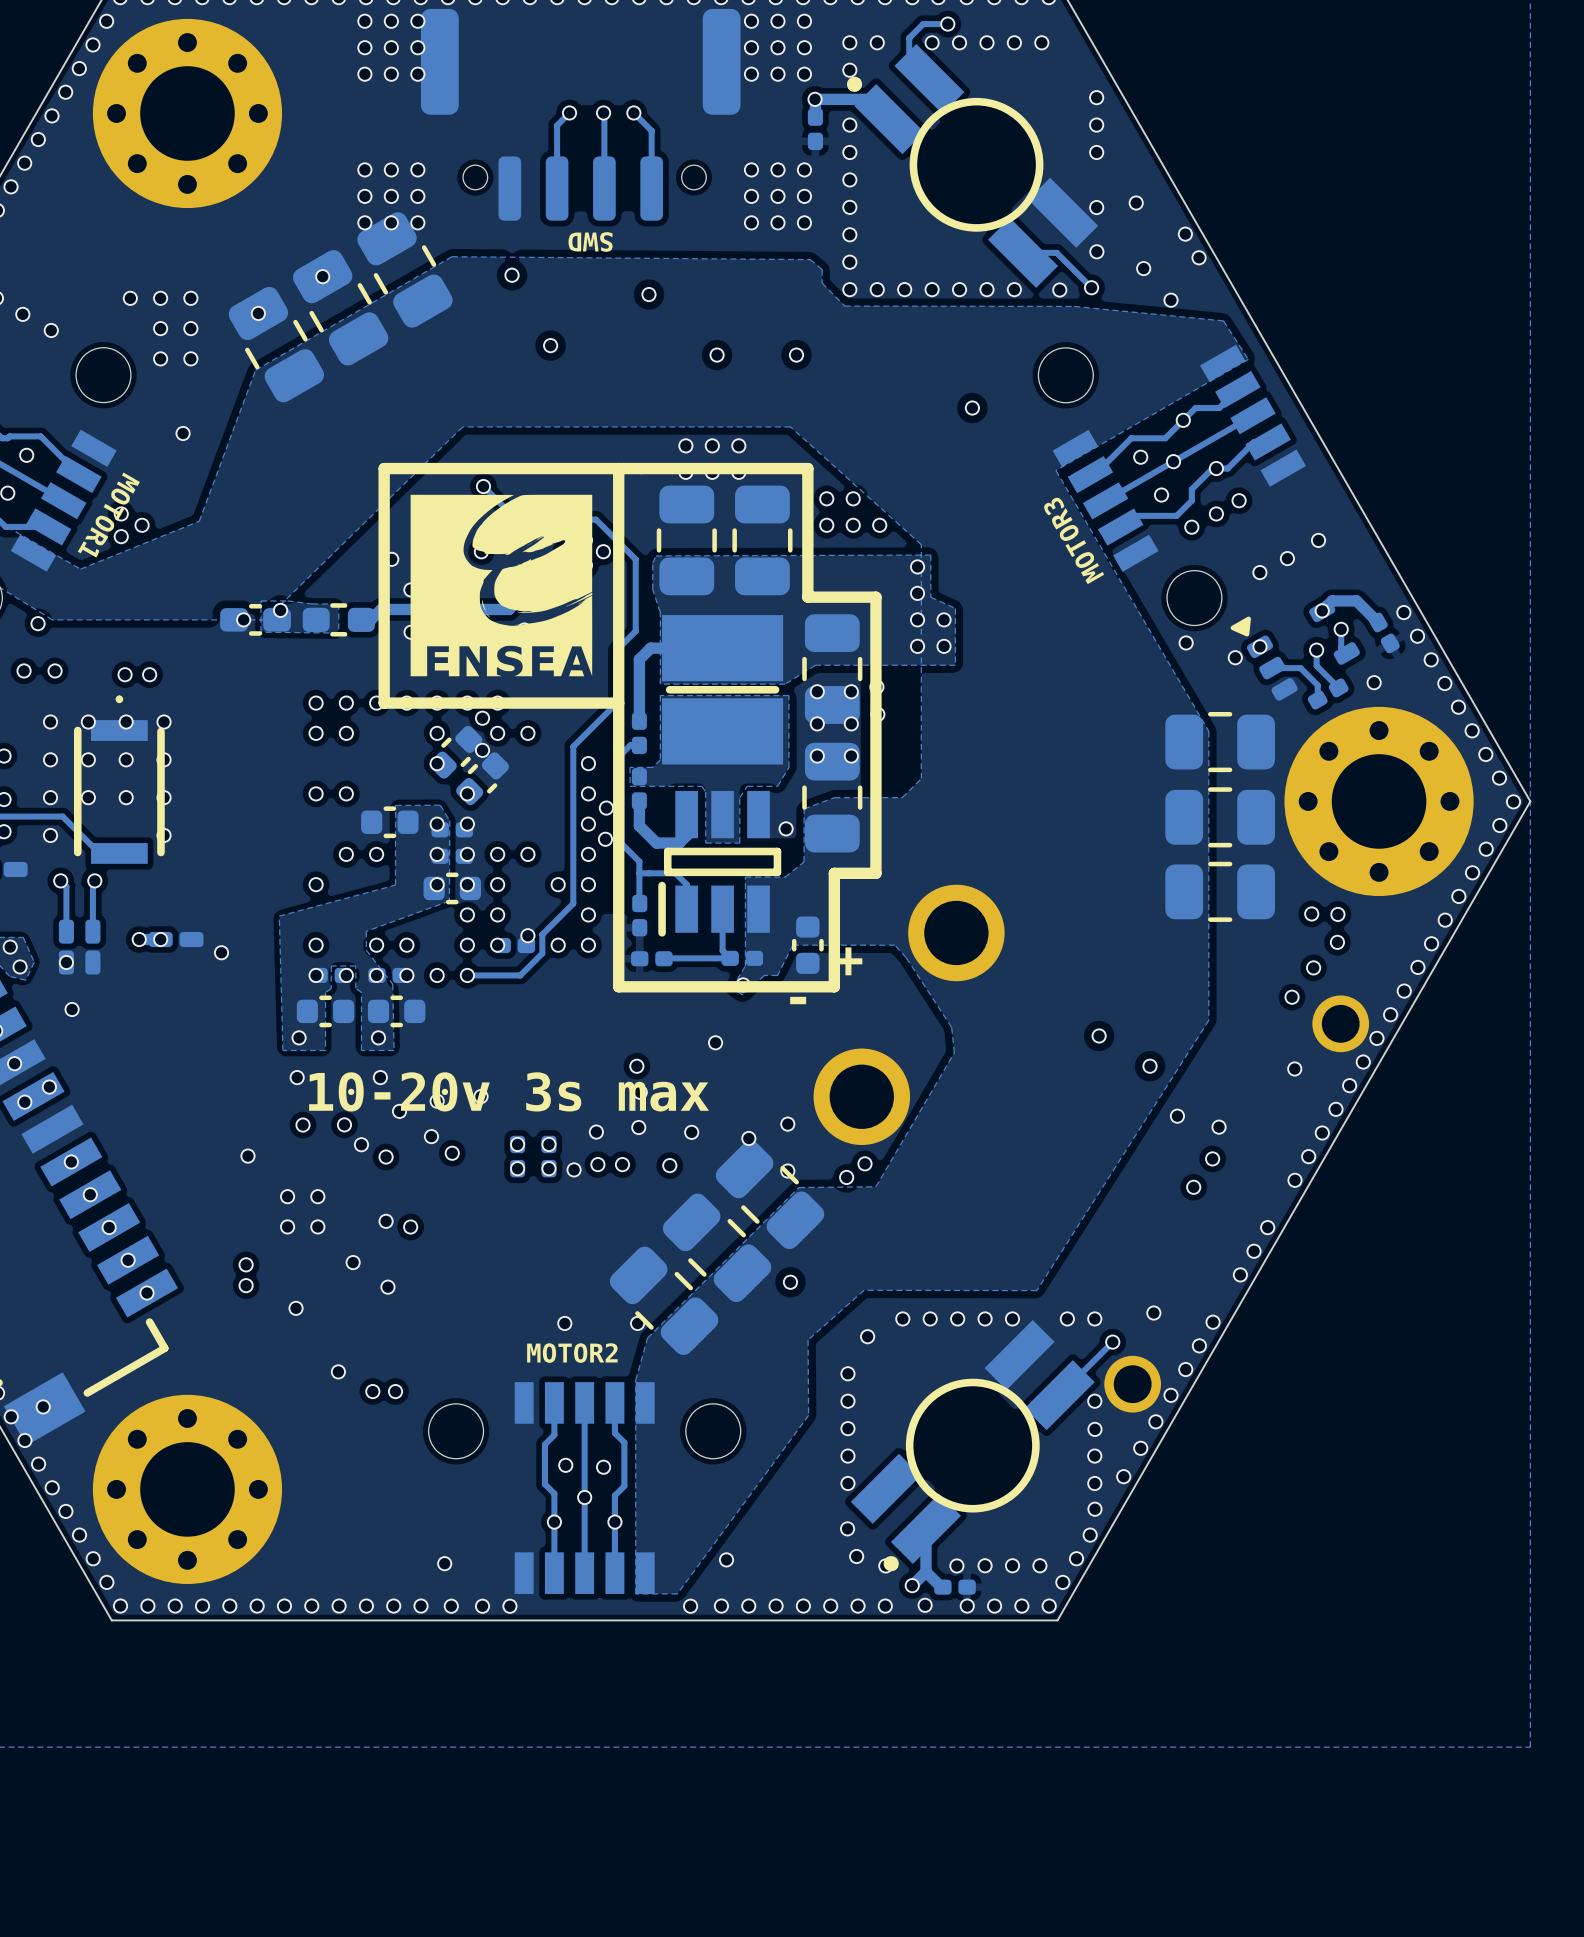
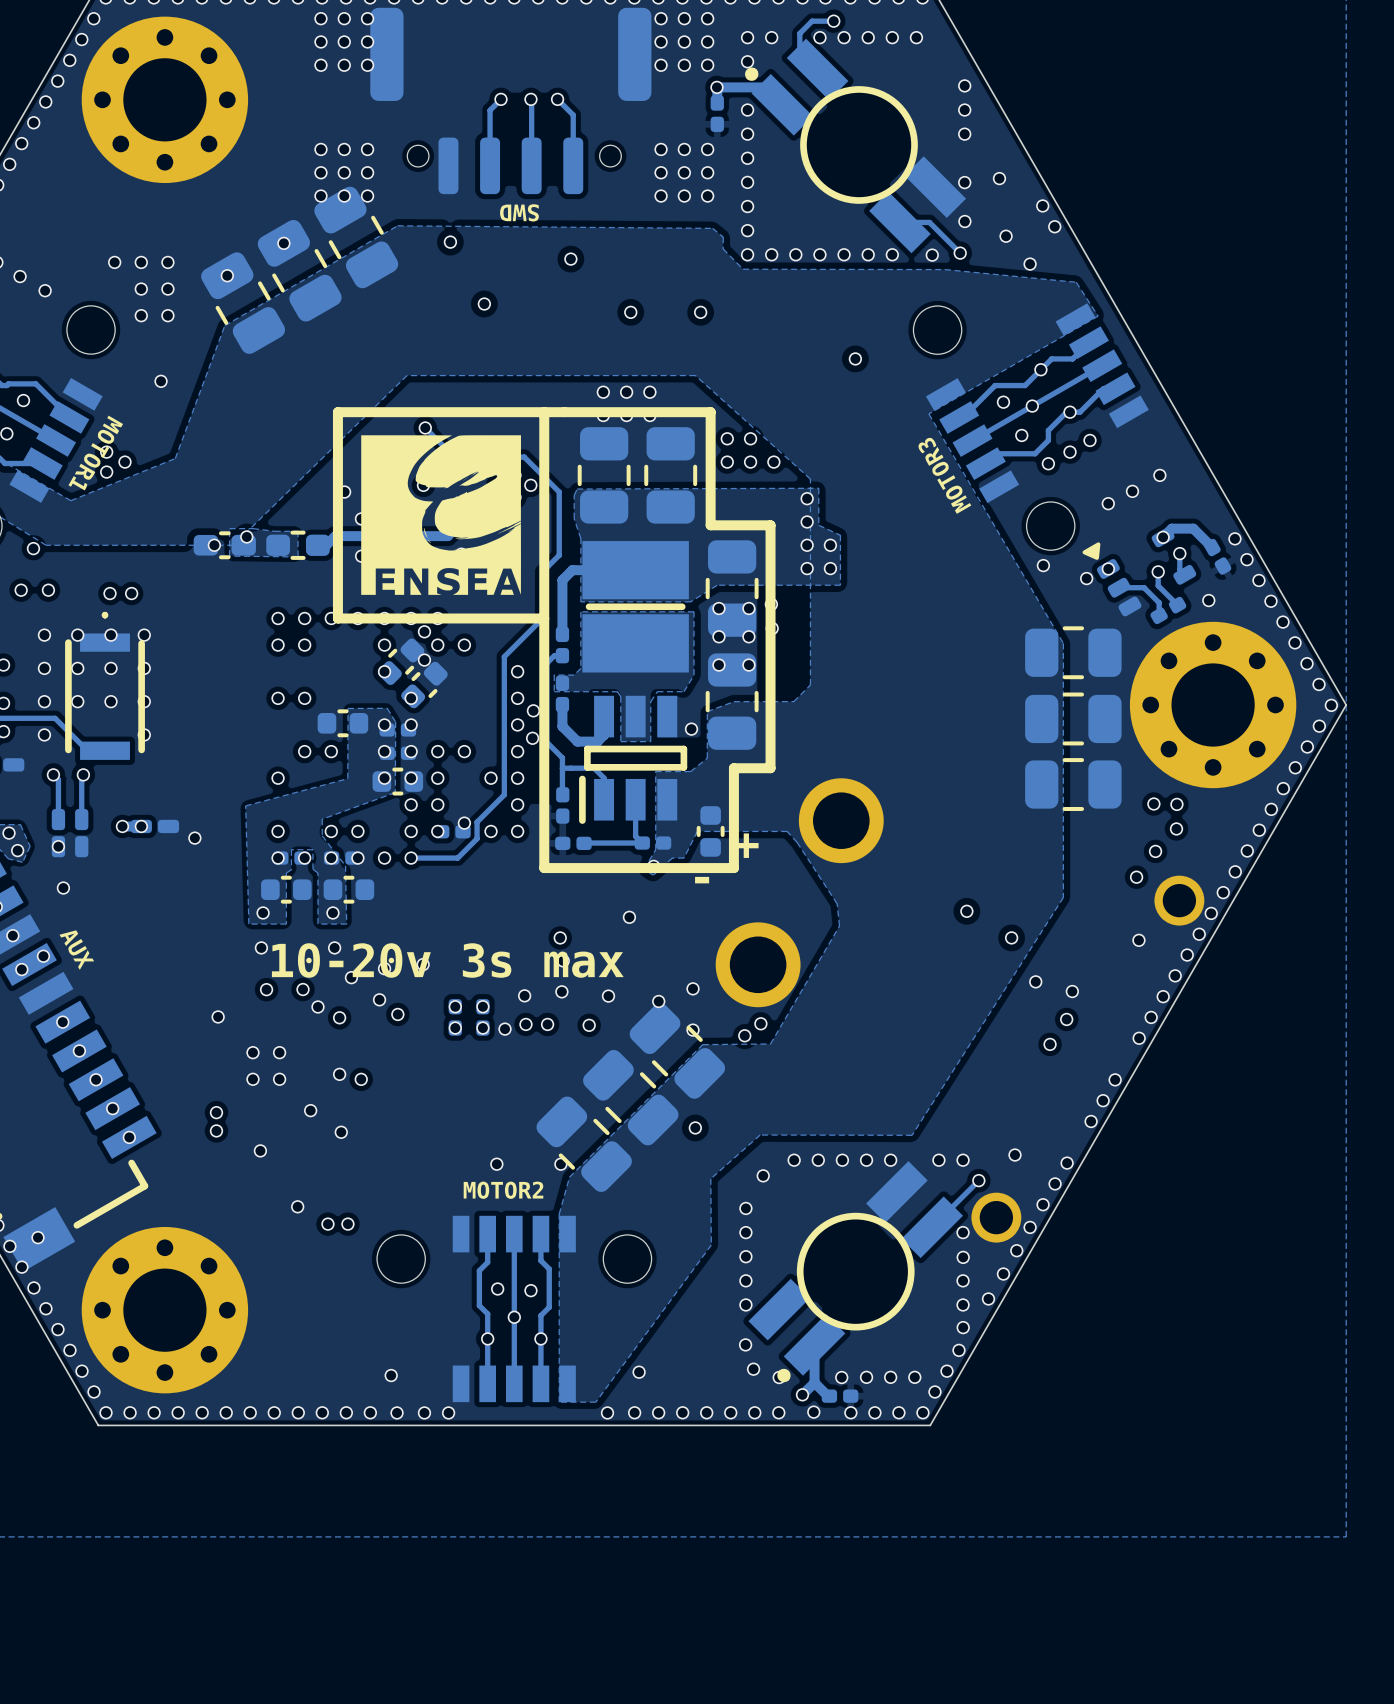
text: none -> AUX (76, 950)

